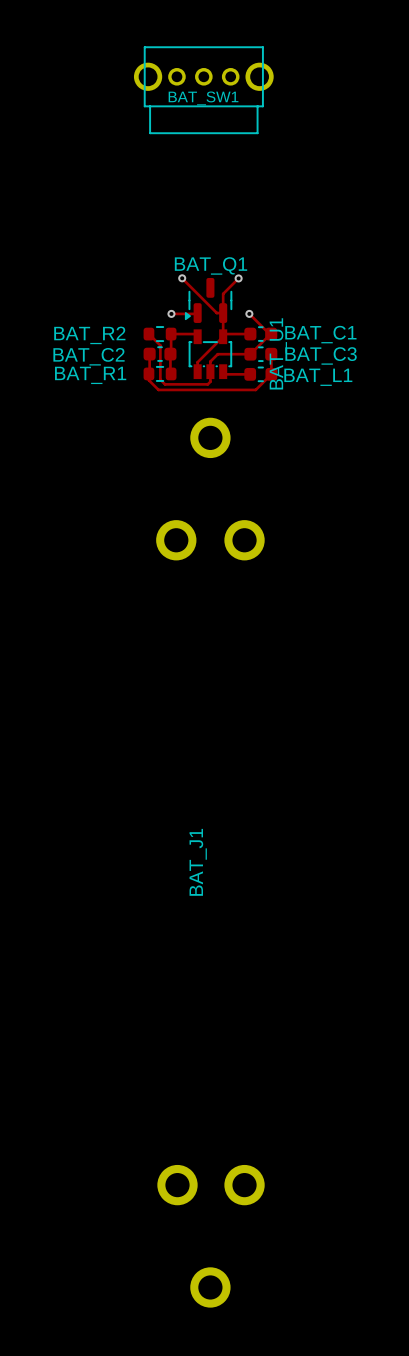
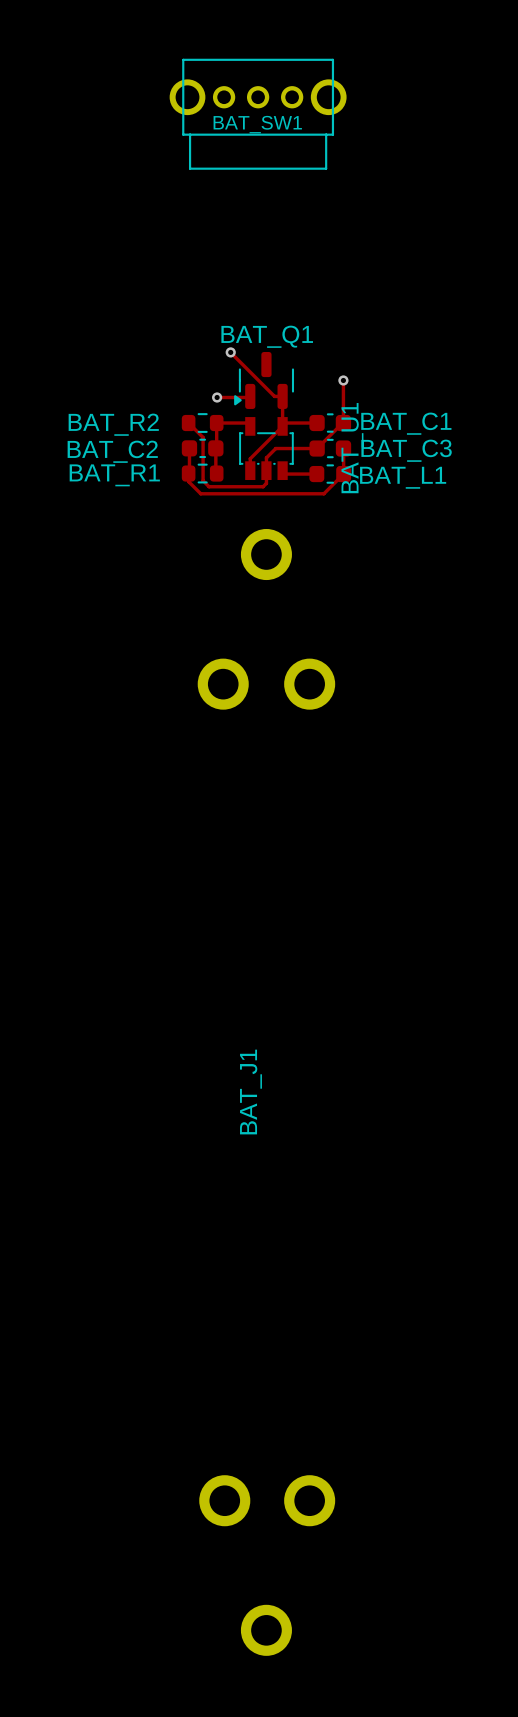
track: (238, 278) (223, 293) (223, 313) -> none
via: (238, 278) -> none
track: none -> (343, 380) (343, 423)
via: none -> (343, 380)
track: (249, 313) (270, 334) -> none
via: (249, 313) -> none

